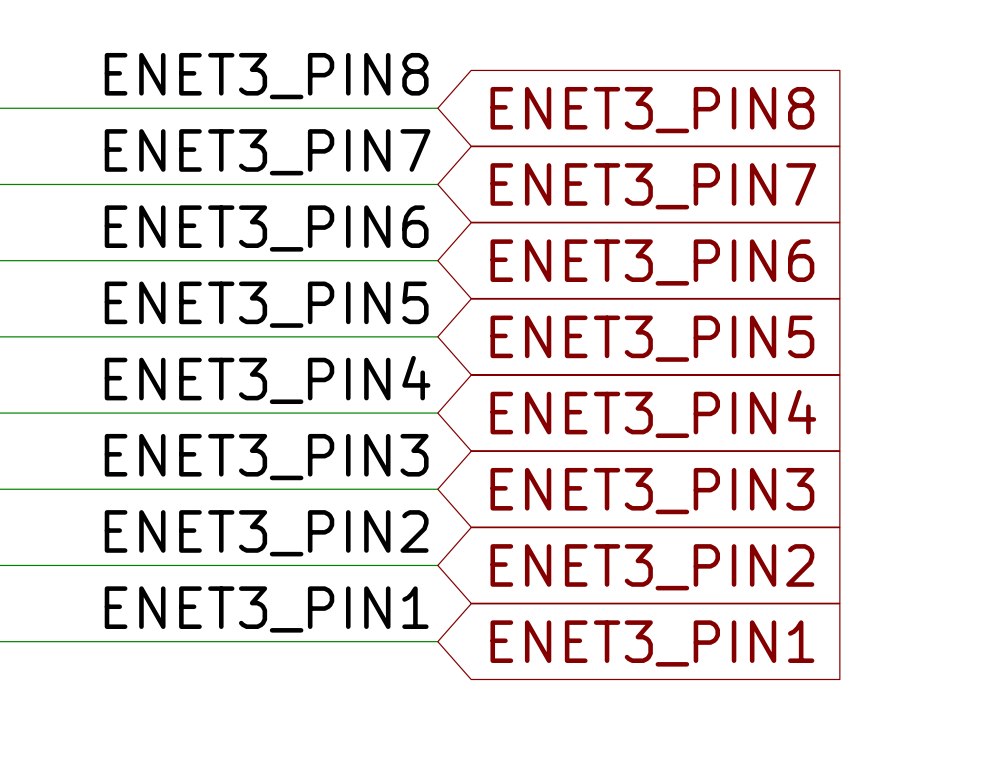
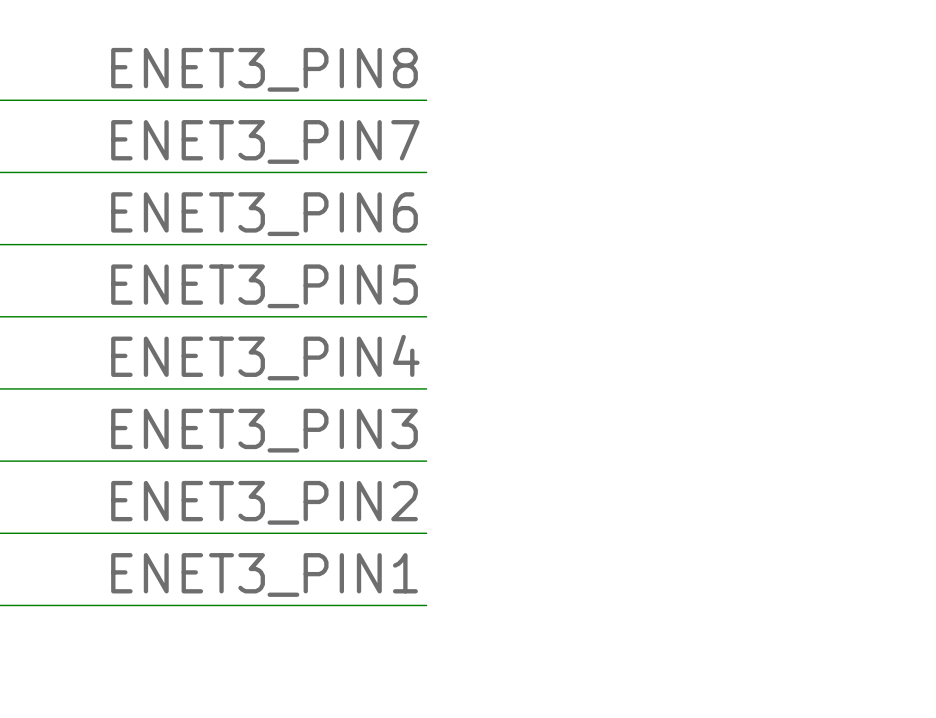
global label: ENET3_PIN8 (652, 110) -> none
global label: ENET3_PIN7 (653, 186) -> none
global label: ENET3_PIN6 (652, 262) -> none
global label: ENET3_PIN5 (652, 338) -> none
global label: ENET3_PIN4 (653, 413) -> none
global label: ENET3_PIN3 (652, 491) -> none
global label: ENET3_PIN2 (652, 567) -> none
global label: ENET3_PIN1 (652, 643) -> none

